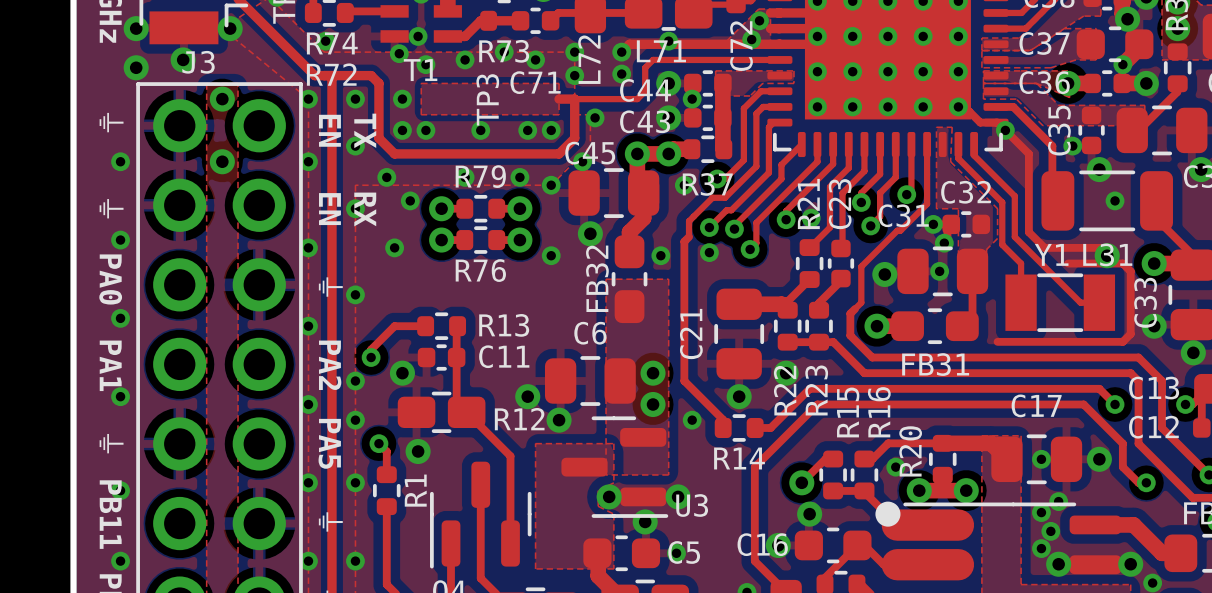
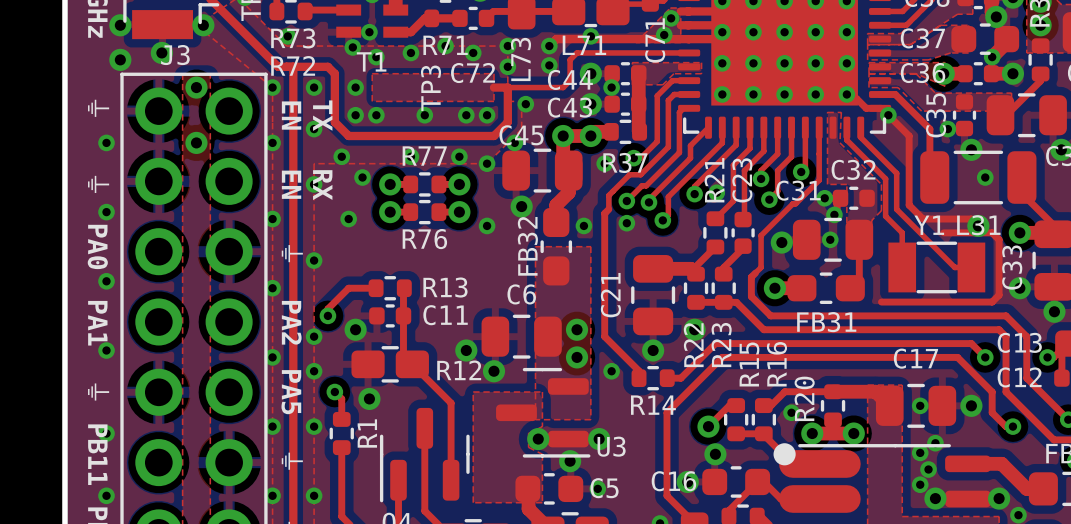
R74 name: R74 (332, 43) -> R73 (293, 38)
C72 name: C72 (741, 46) -> C71 (655, 40)
R73 name: R73 (504, 51) -> R71 (445, 45)
L72 name: L72 (589, 59) -> L73 (520, 59)
C71 name: C71 (535, 82) -> C72 (473, 73)
R79 name: R79 (480, 176) -> R77 (424, 156)

